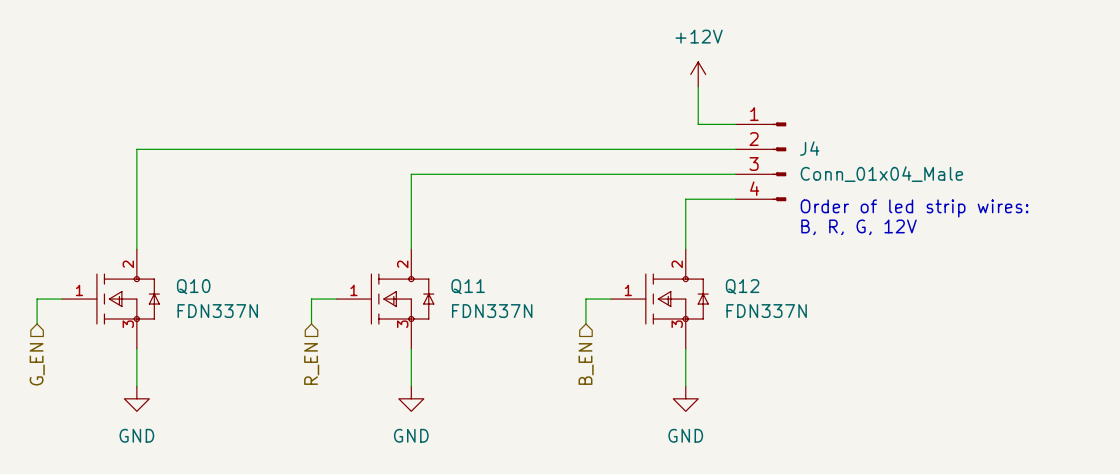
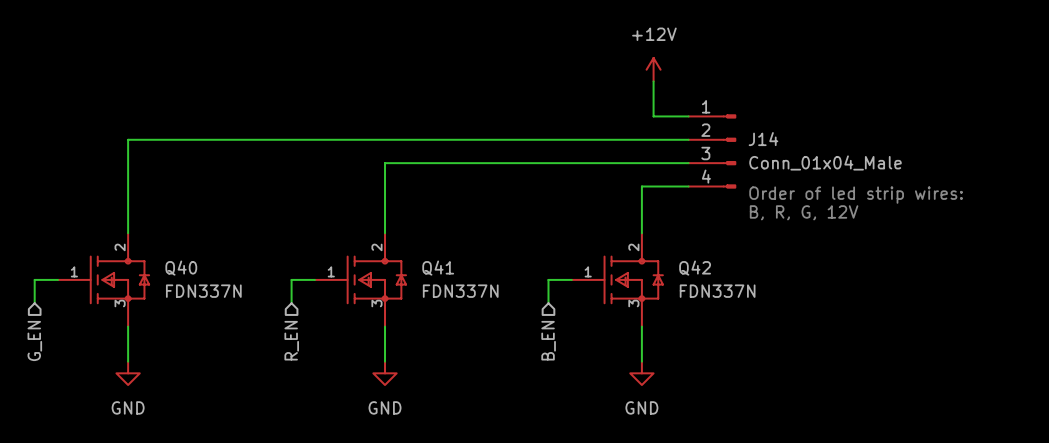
J4 name: J4 (809, 148) -> J14 (763, 139)
Q10 name: Q10 (193, 286) -> Q40 (181, 268)
Q11 name: Q11 (468, 286) -> Q41 (438, 268)
Q12 name: Q12 (742, 286) -> Q42 (695, 268)

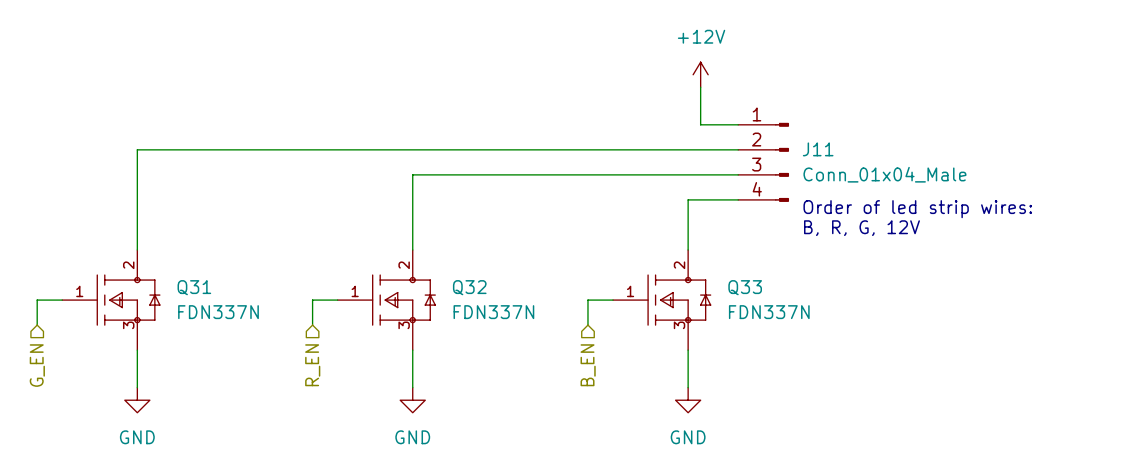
J14 name: J14 (763, 139) -> J11 (818, 149)
Q40 name: Q40 (181, 268) -> Q31 (194, 287)
Q41 name: Q41 (438, 268) -> Q32 (469, 287)
Q42 name: Q42 (695, 268) -> Q33 (745, 287)

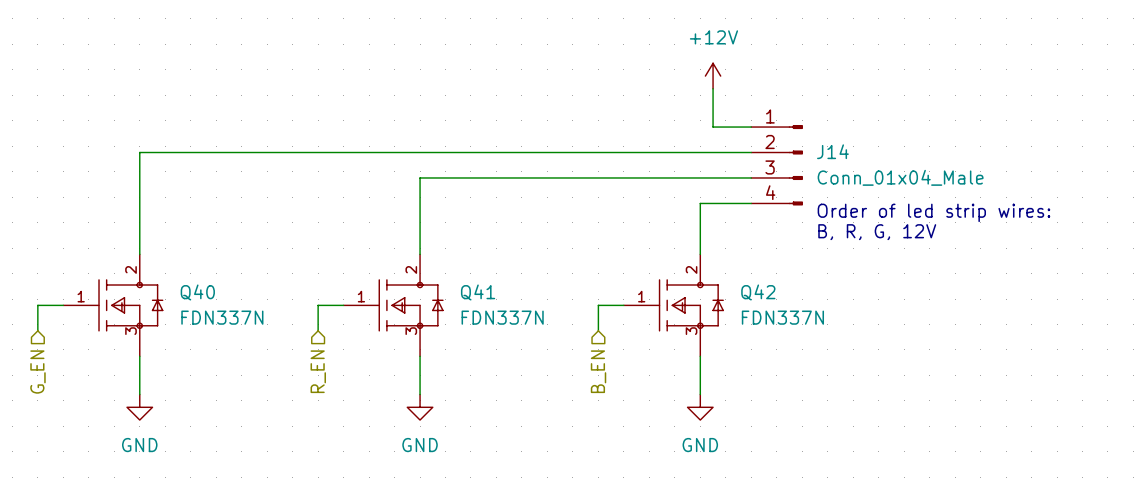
J11 name: J11 (818, 149) -> J14 (832, 151)
Q31 name: Q31 (194, 287) -> Q40 (197, 292)
Q32 name: Q32 (469, 287) -> Q41 (478, 292)
Q33 name: Q33 (745, 287) -> Q42 (758, 292)

